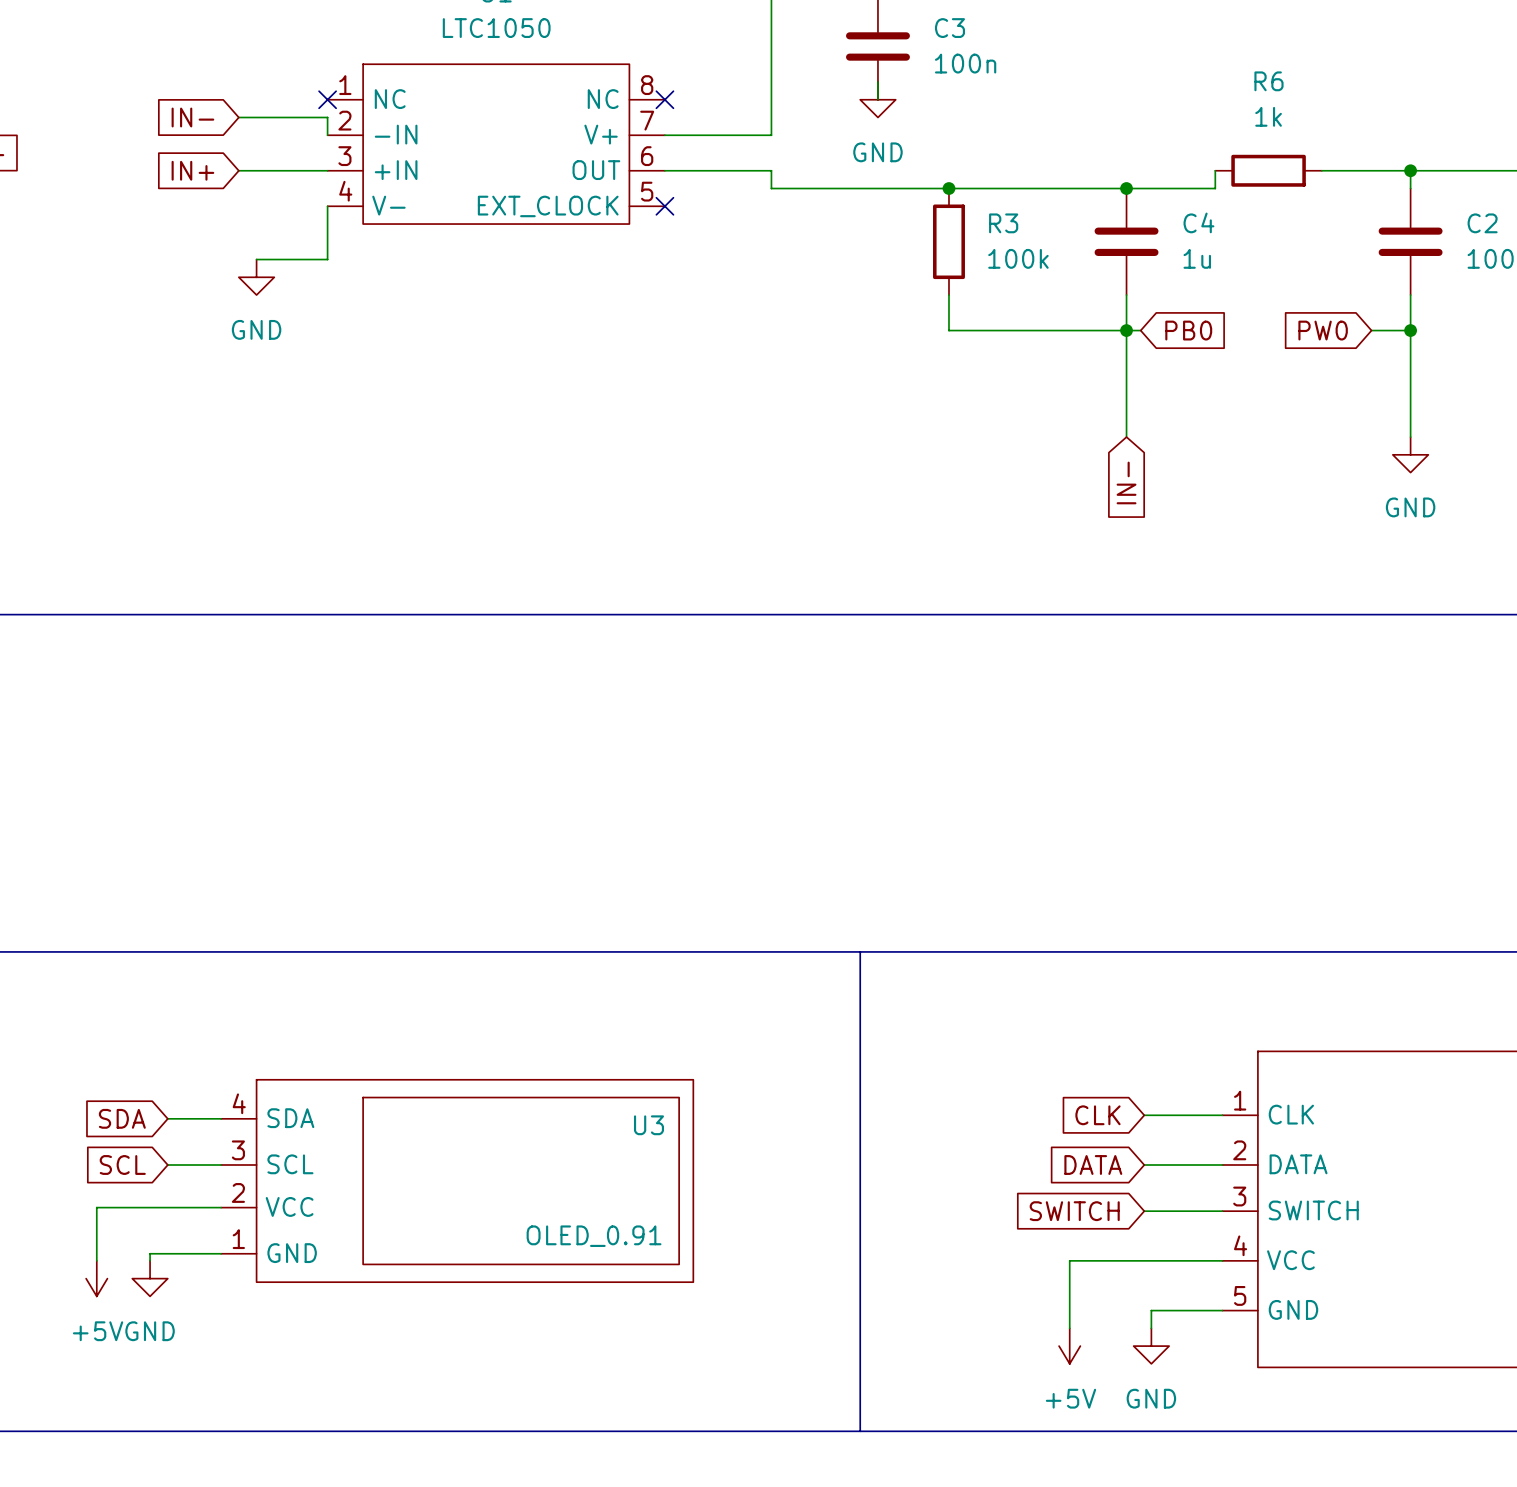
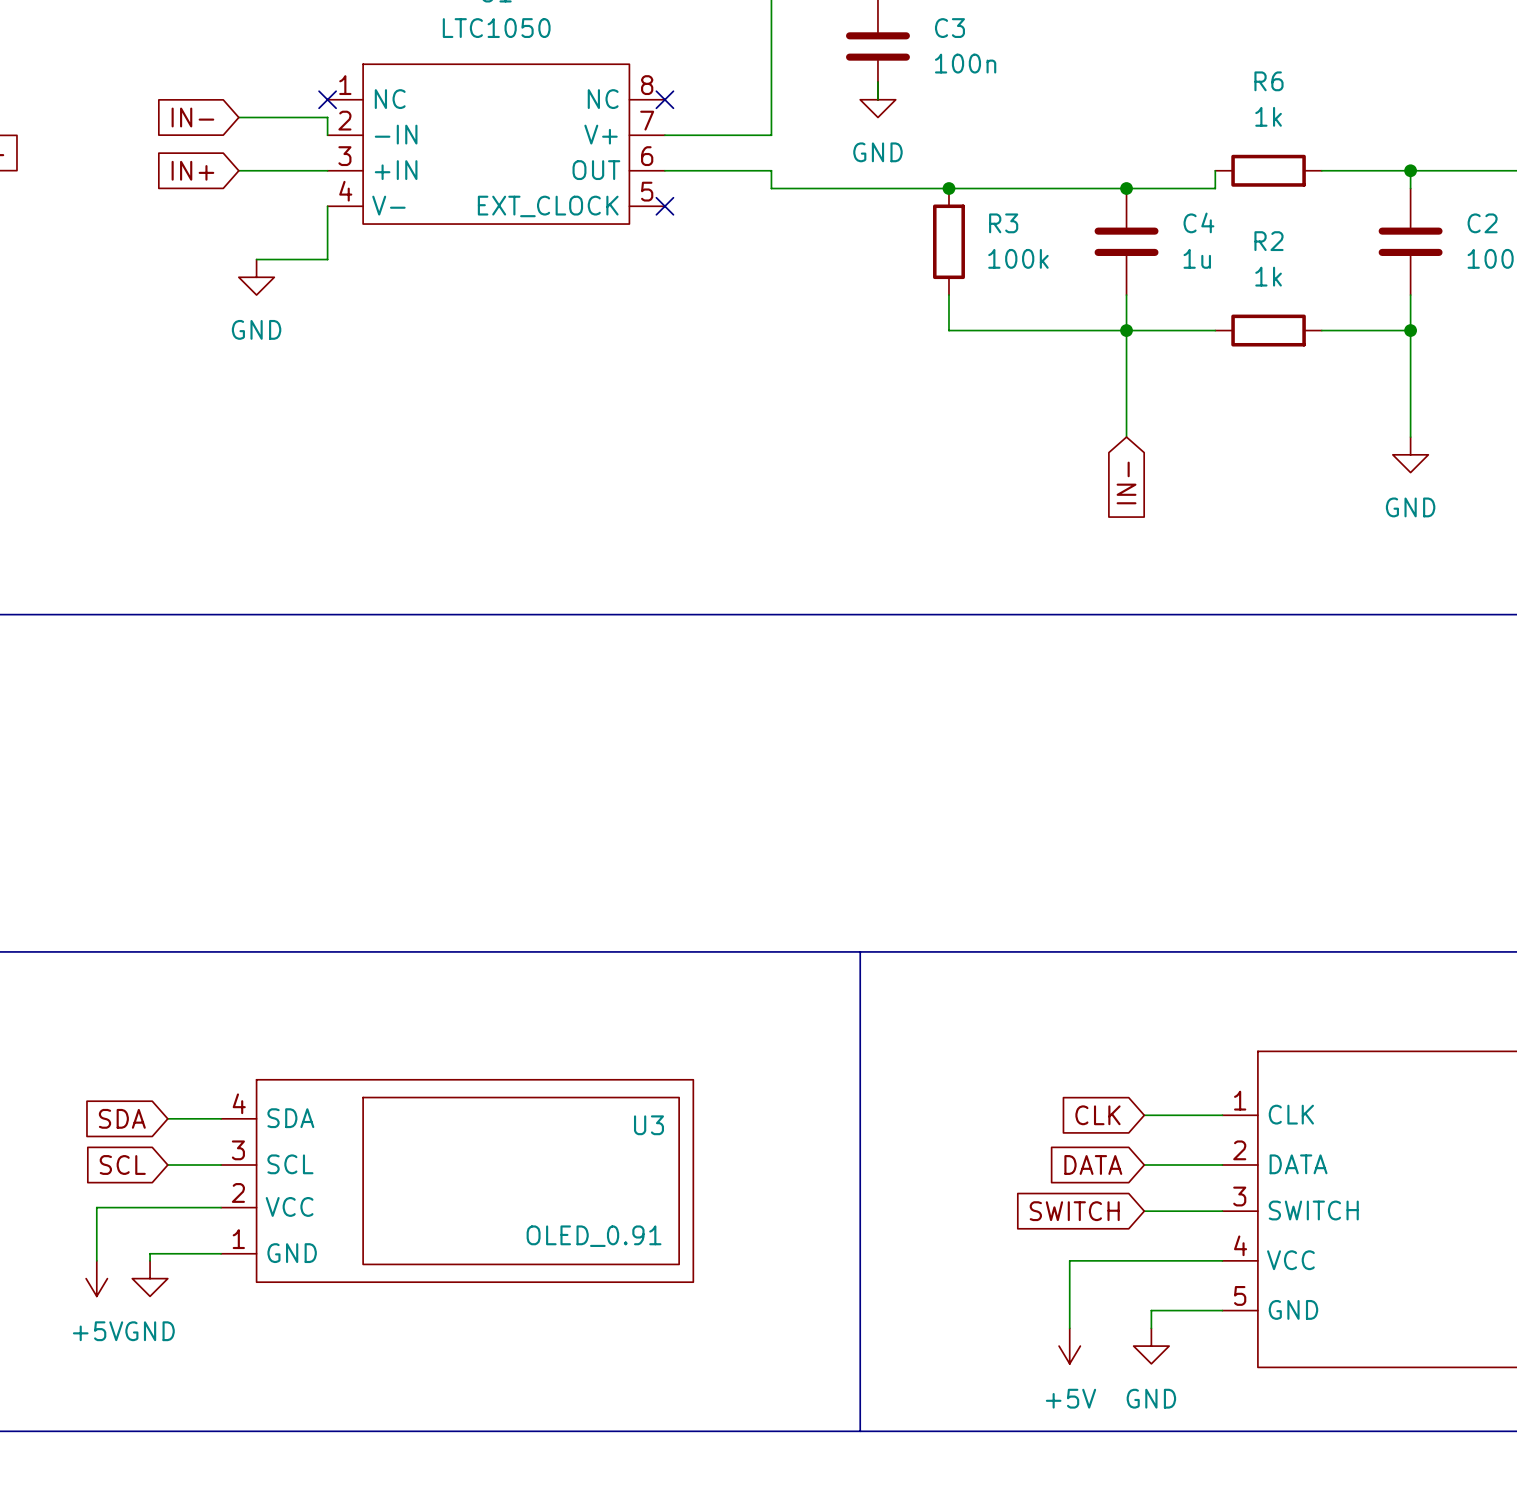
wire: none -> (1140, 330) (1215, 330)
global label: PB0 (1188, 330) -> none
R2: none -> 1k (1268, 330)
wire: none -> (1321, 330) (1371, 330)
global label: PW0 (1323, 330) -> none

